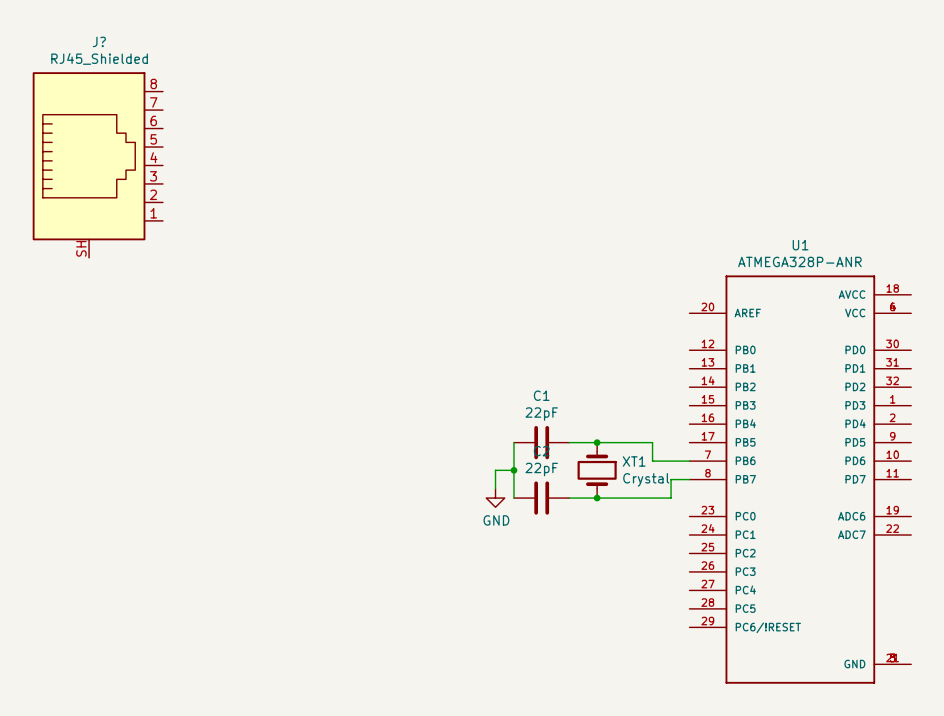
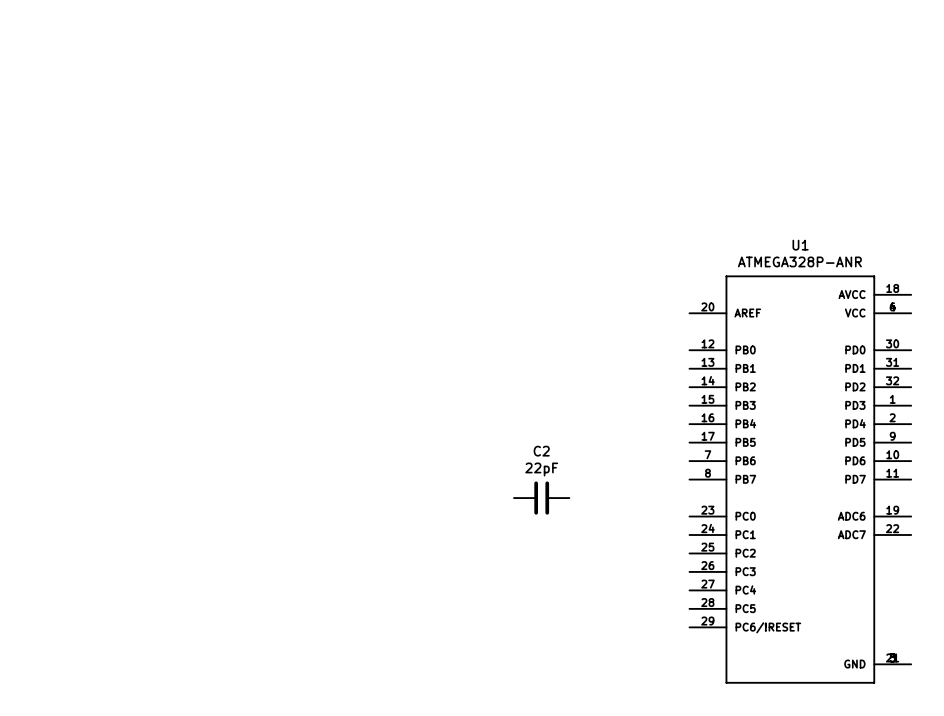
J?: RJ45_Shielded (97, 165) -> none
wire: (513, 442) (513, 498) -> none
C1: 22pF (541, 442) -> none
wire: (569, 442) (652, 442) (652, 461) (689, 461) -> none
junction: (597, 442) -> none
wire: (513, 470) (495, 470) (495, 488) -> none
junction: (513, 470) -> none
XT1: Crystal (597, 470) -> none
wire: (689, 479) (671, 479) (671, 498) (569, 498) -> none
power symbol: GND (495, 498) -> none
junction: (597, 498) -> none

